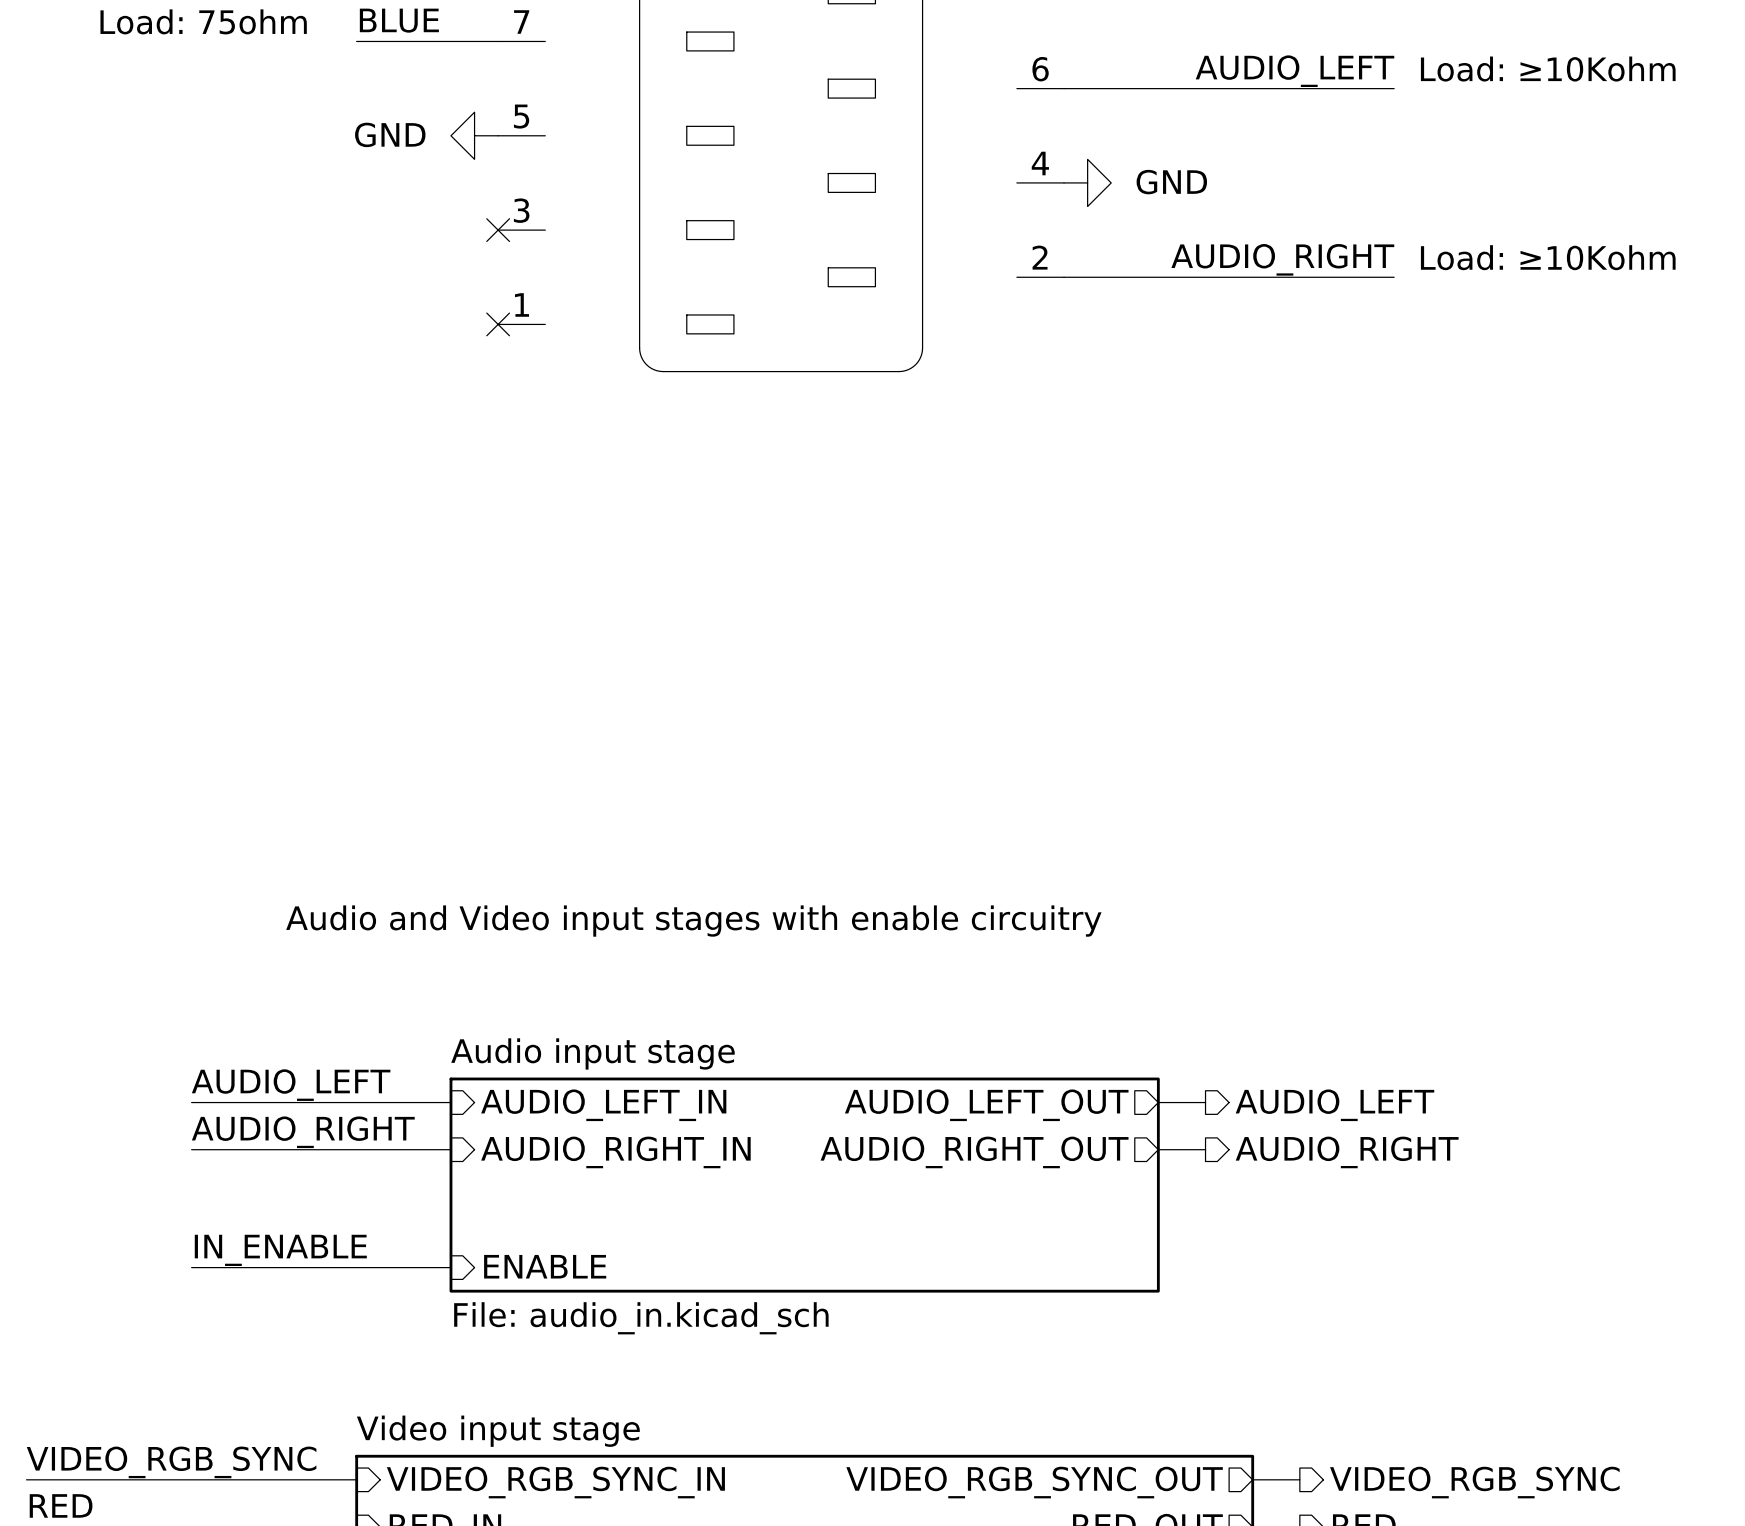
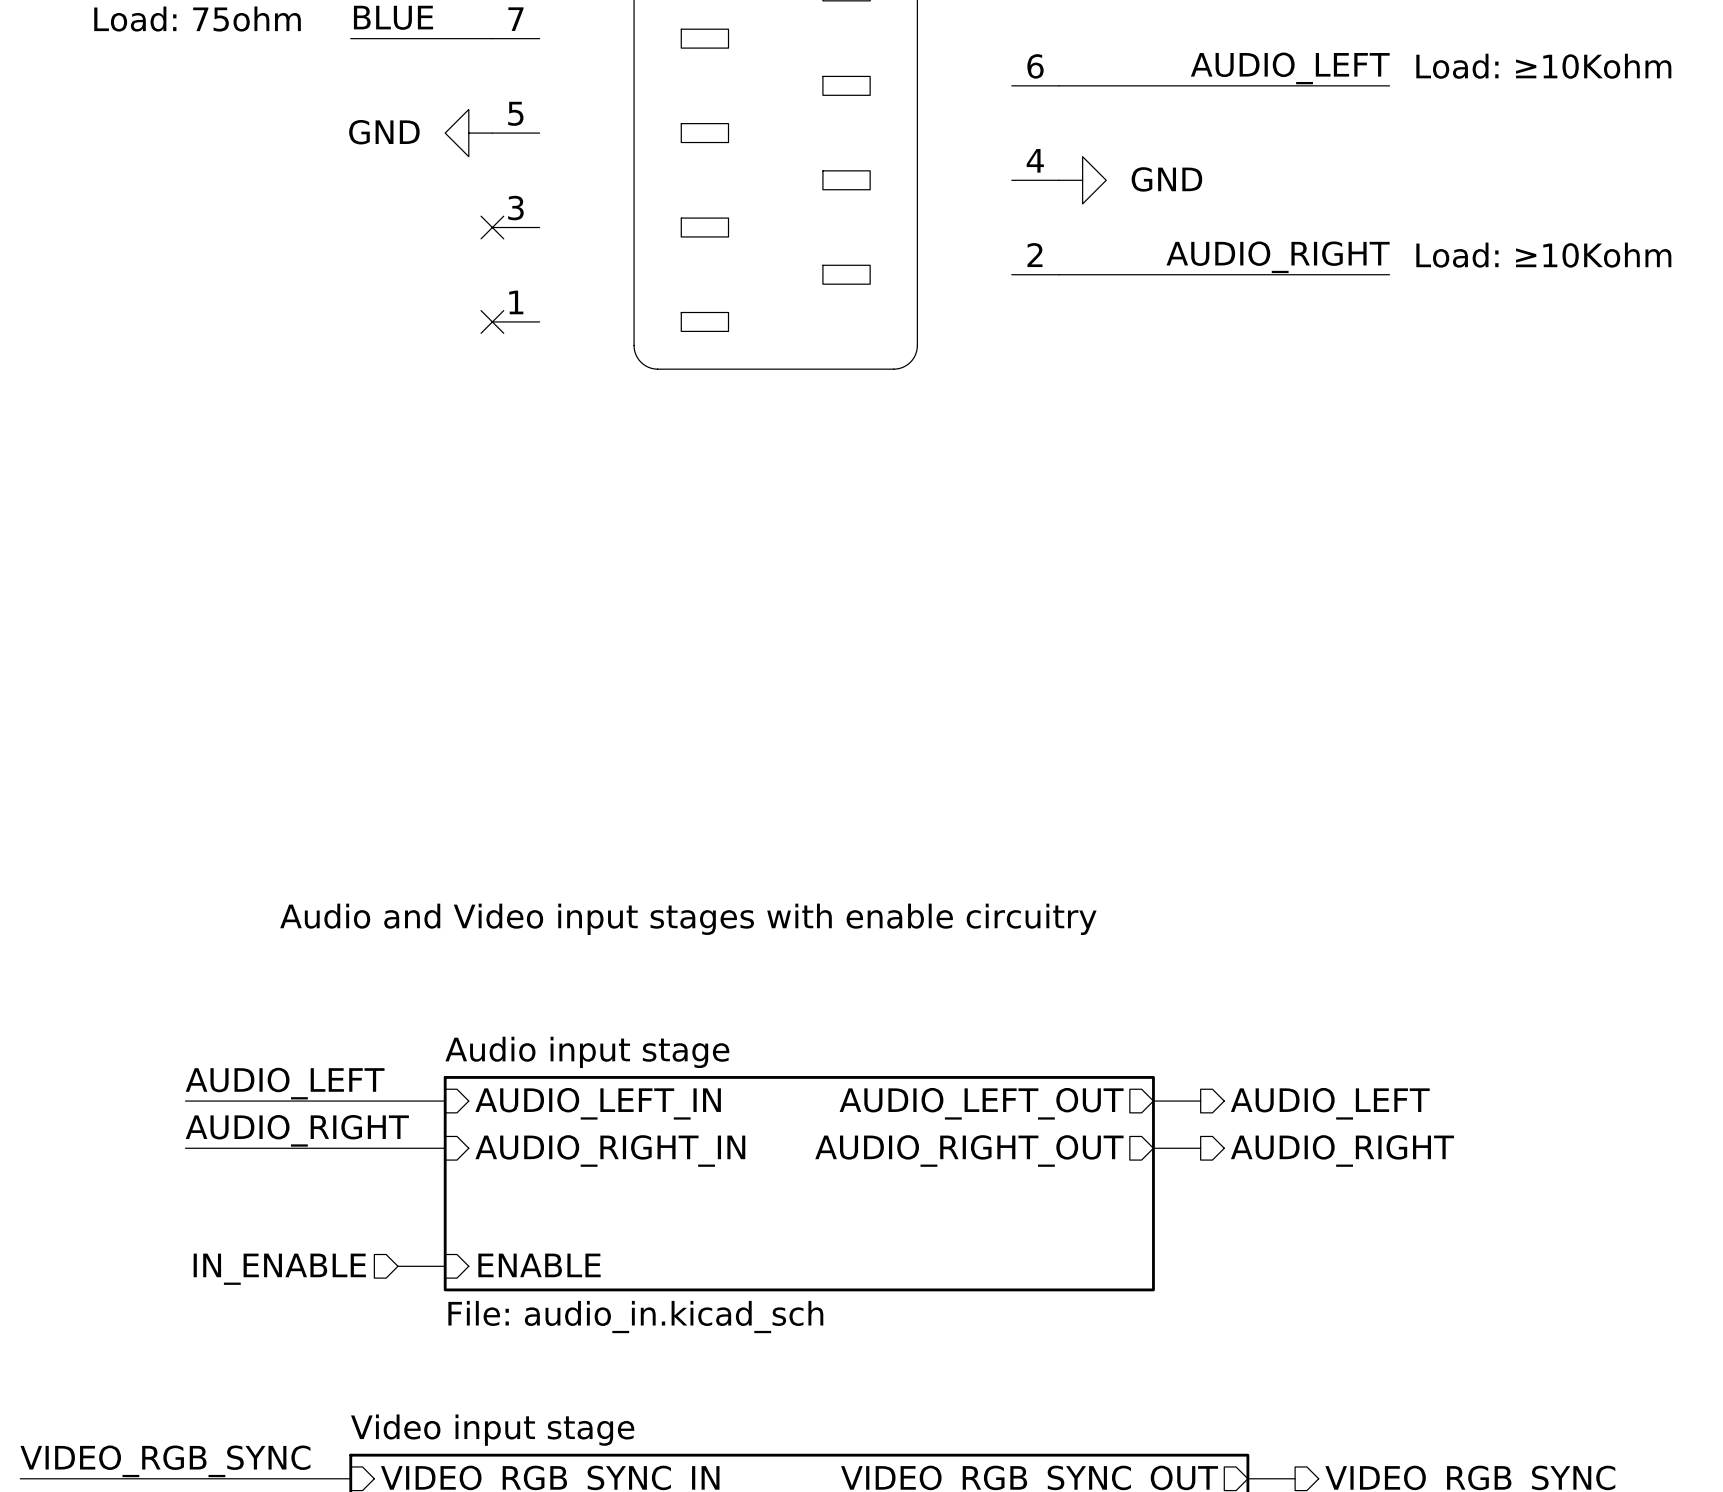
label: IN_ENABLE (280, 1250) -> none
wire: (191, 1267) (403, 1267) -> none
hierarchical label: none -> IN_ENABLE (279, 1269)

